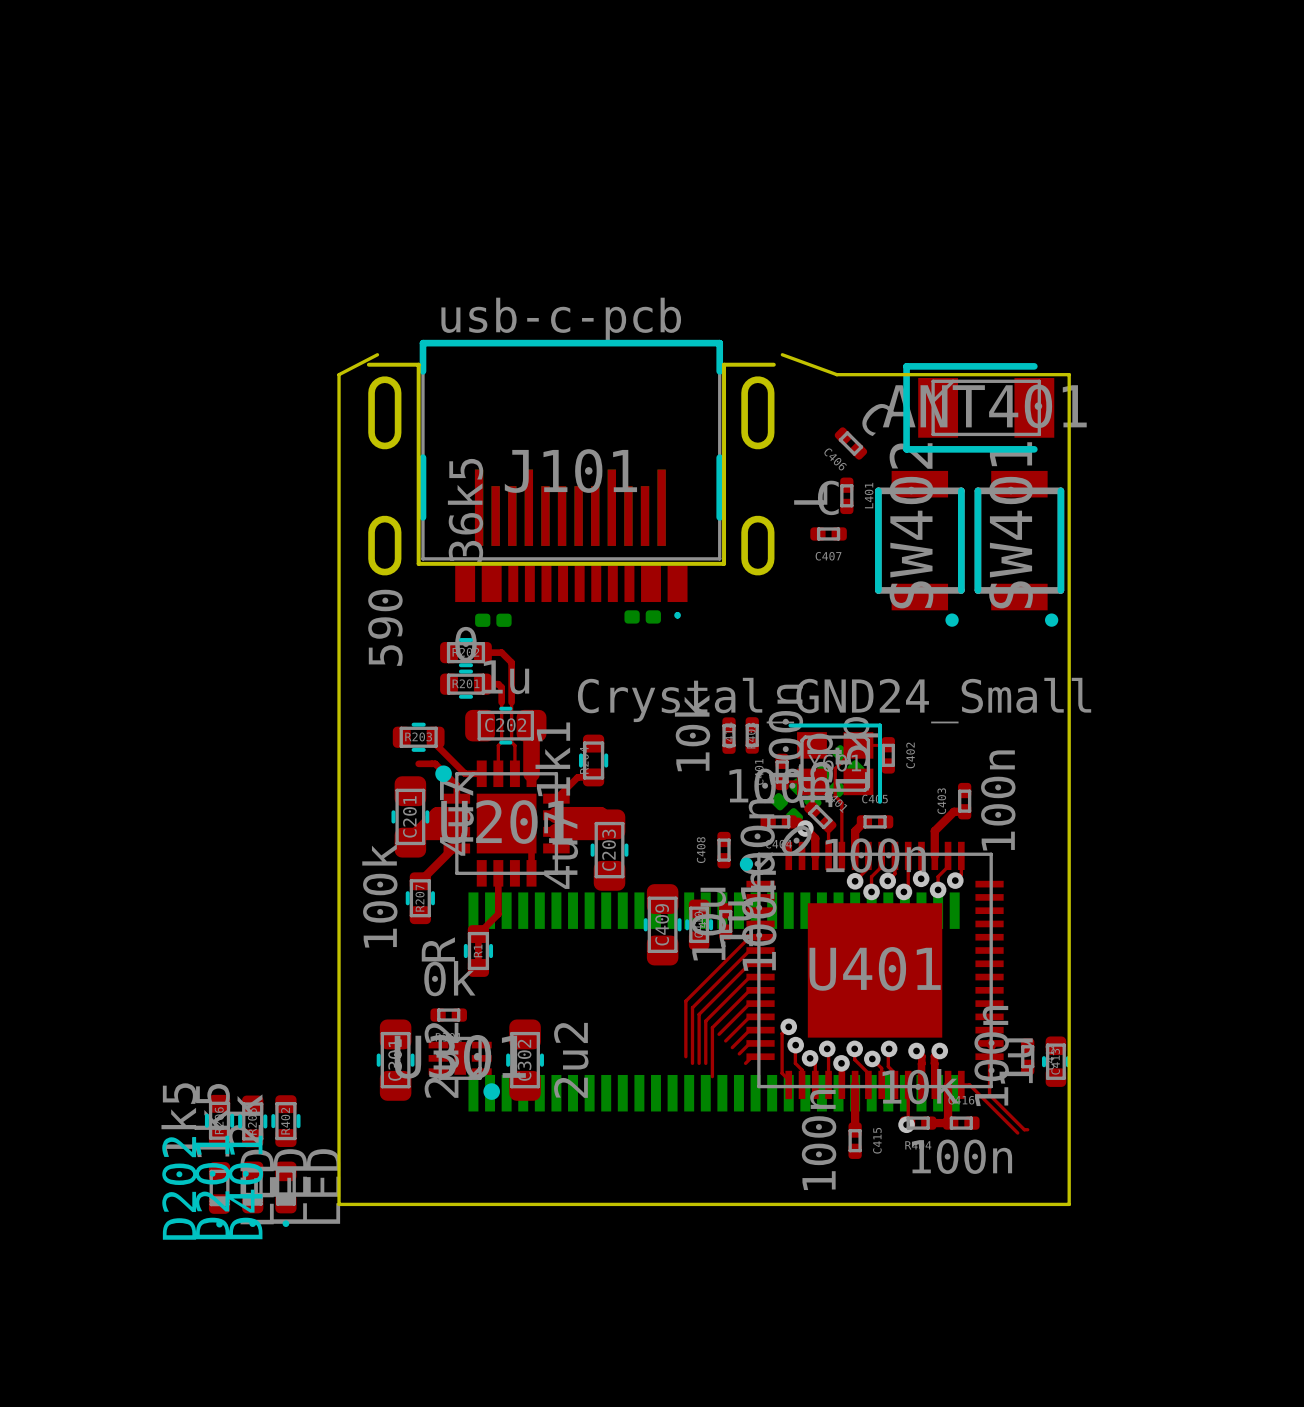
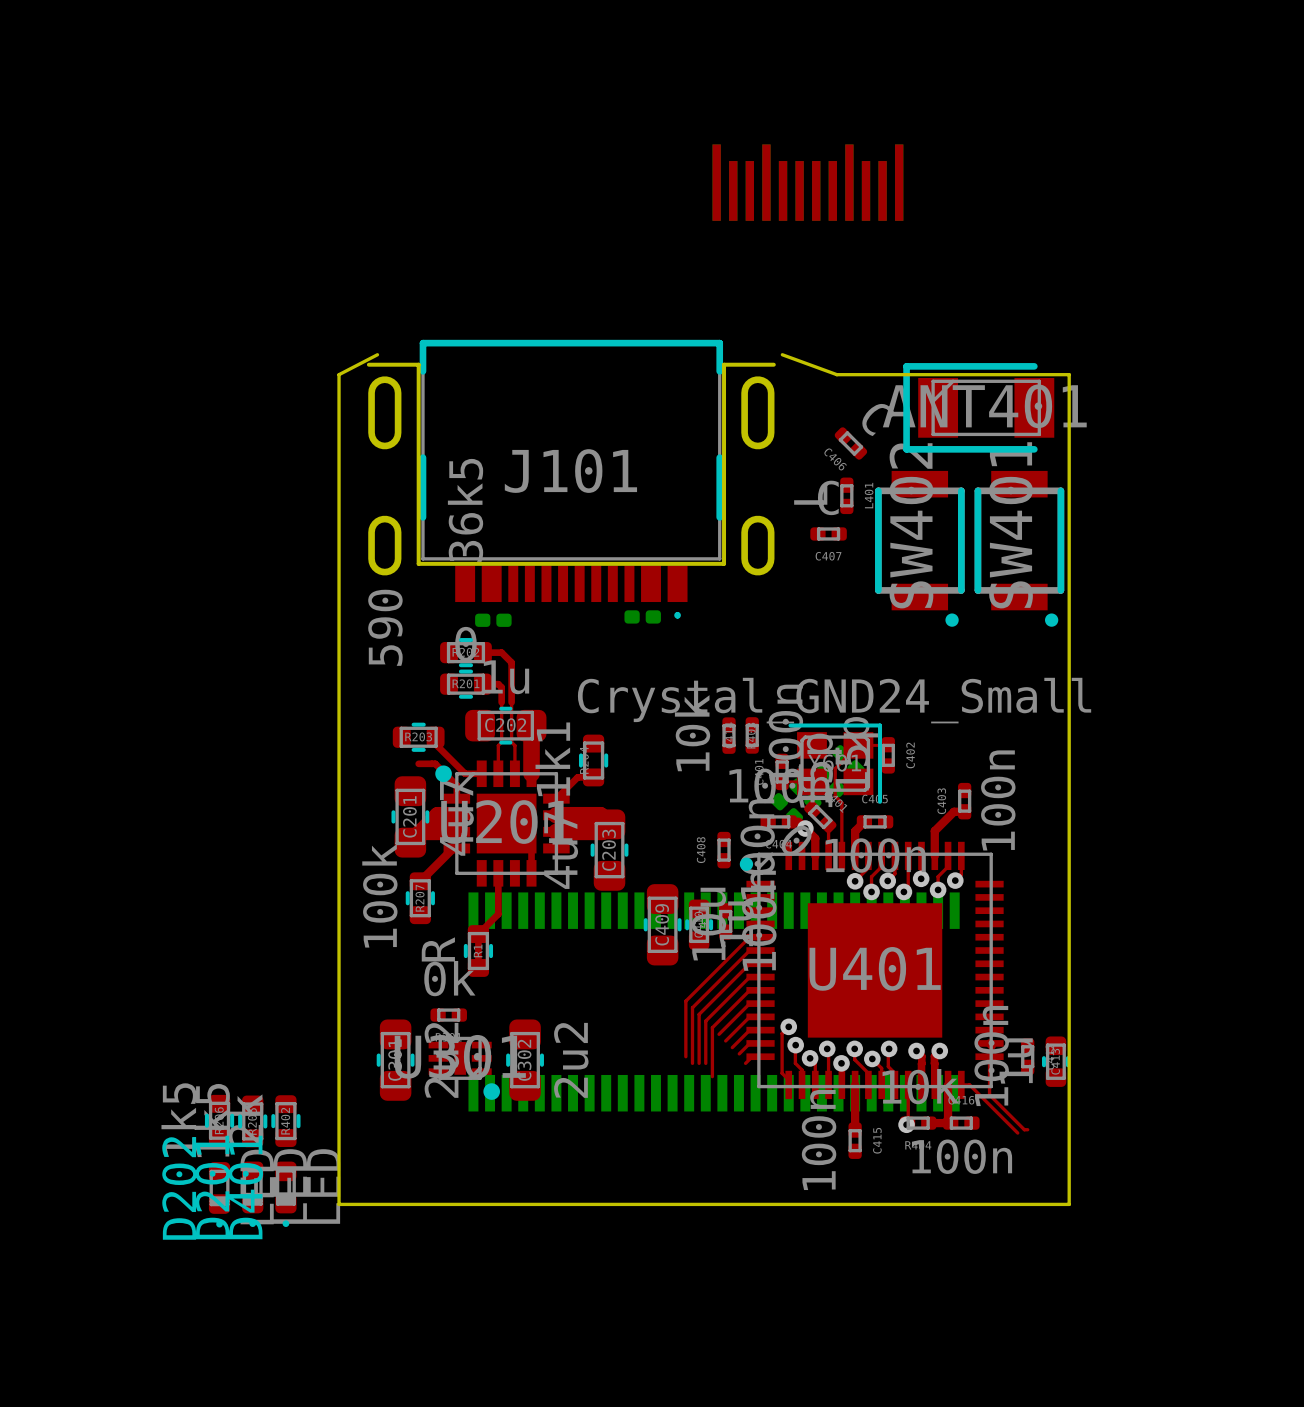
part position: (570, 507) -> (807, 182)

